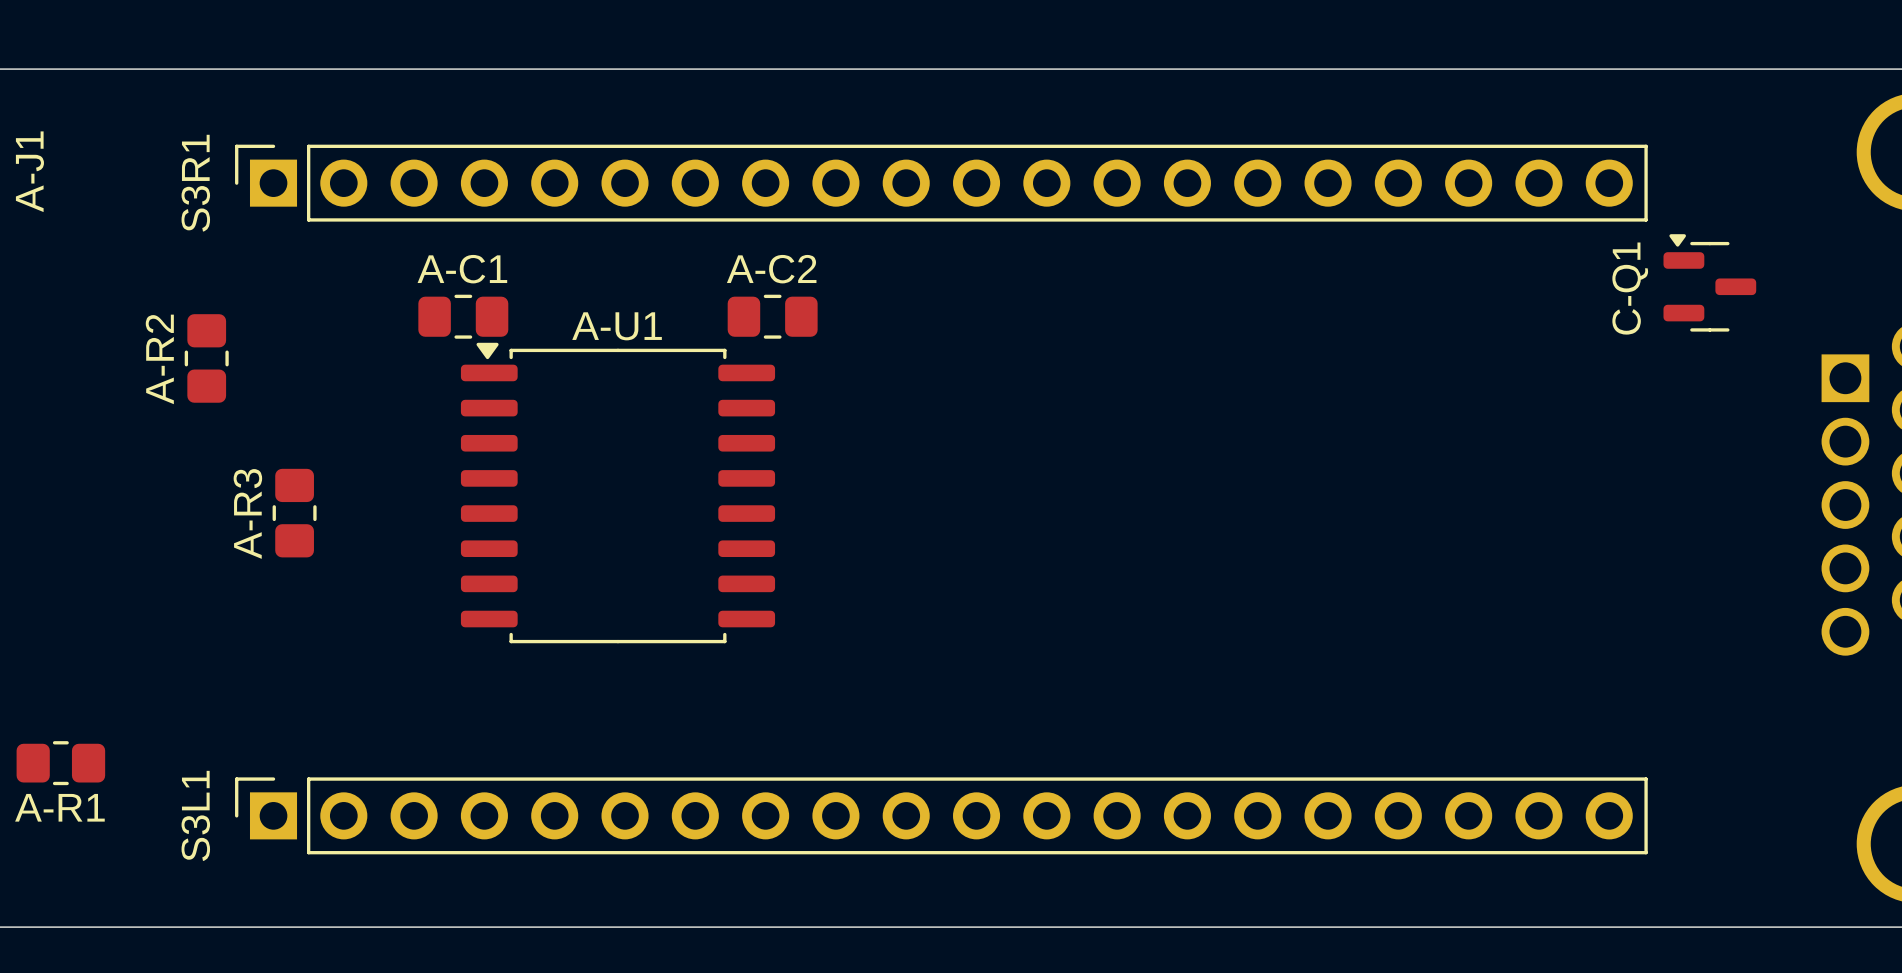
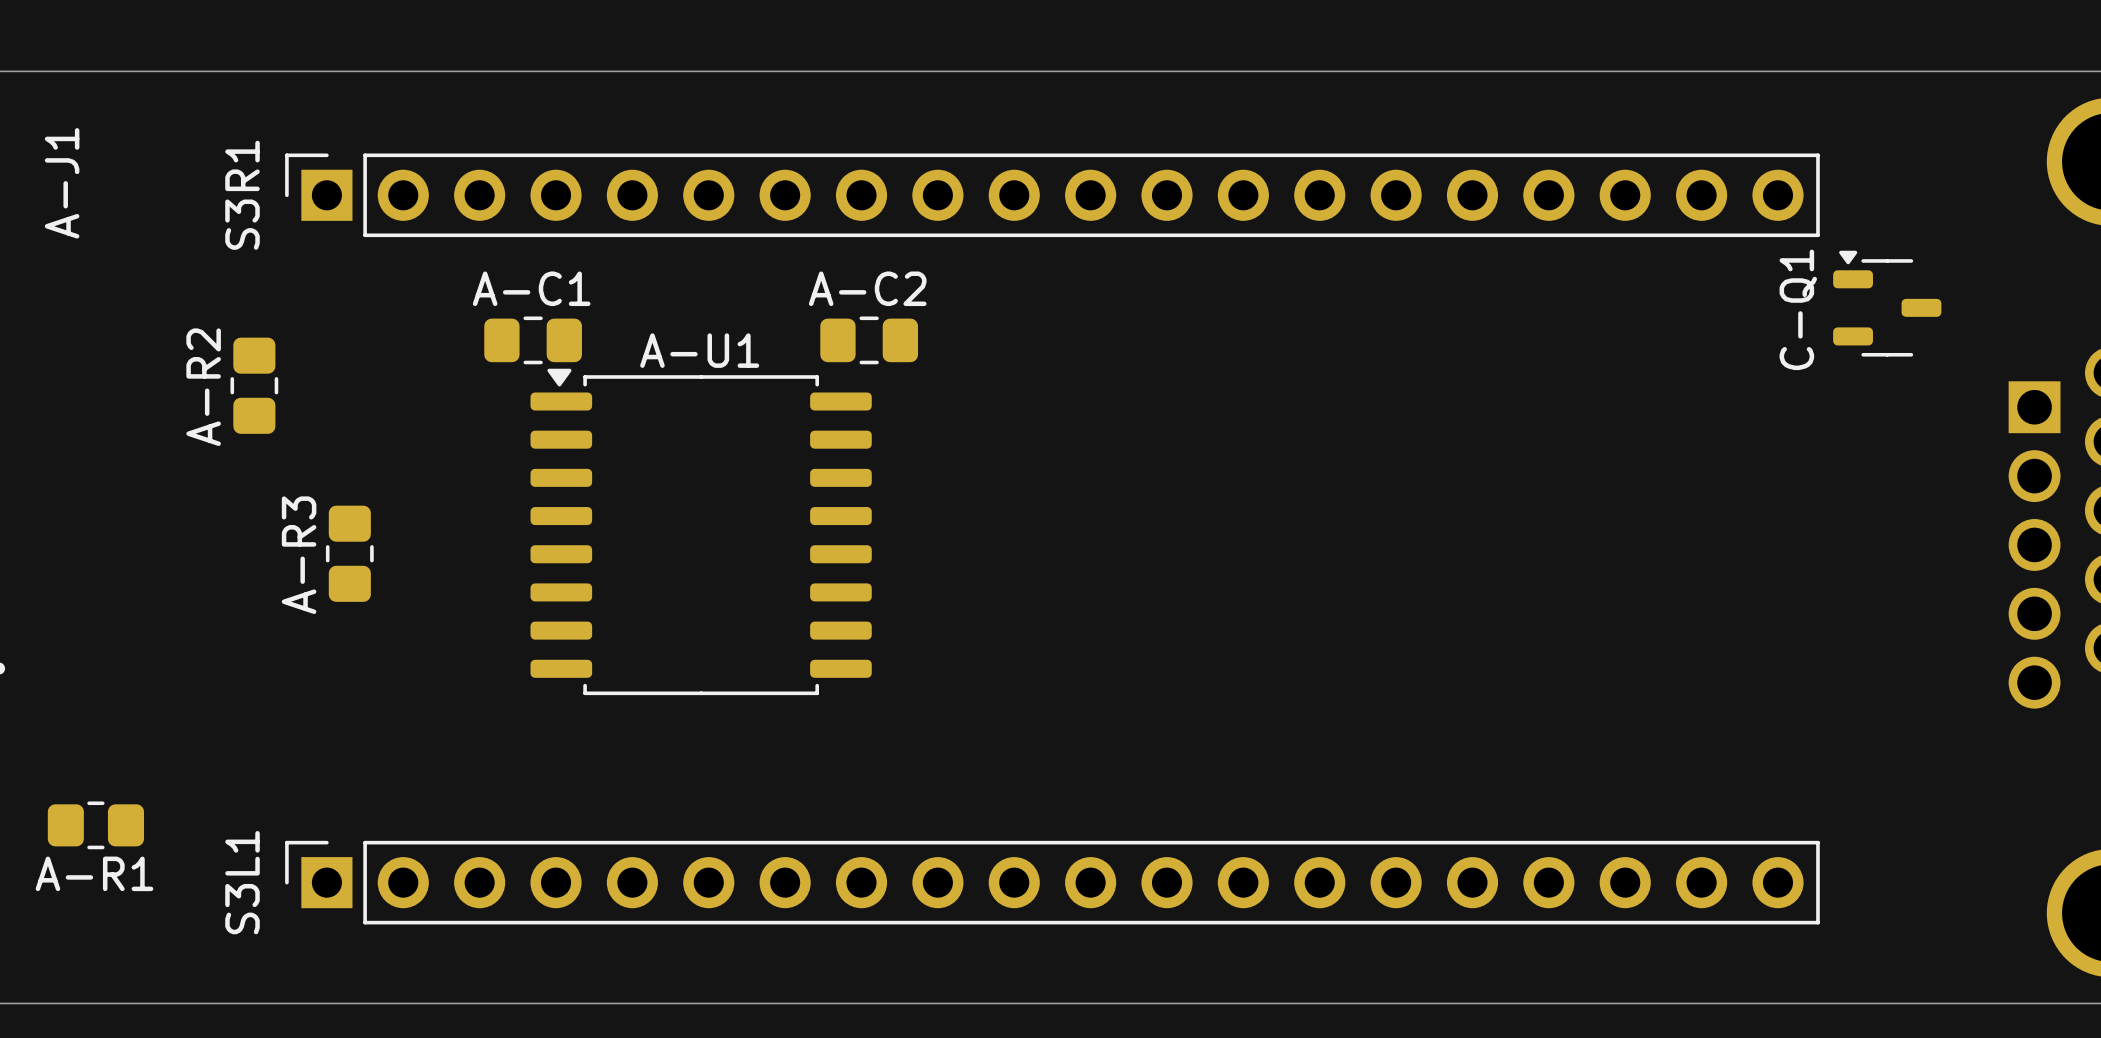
C-Q1 footprint: [1663, 234, 1757, 332] -> [1833, 250, 1942, 357]

